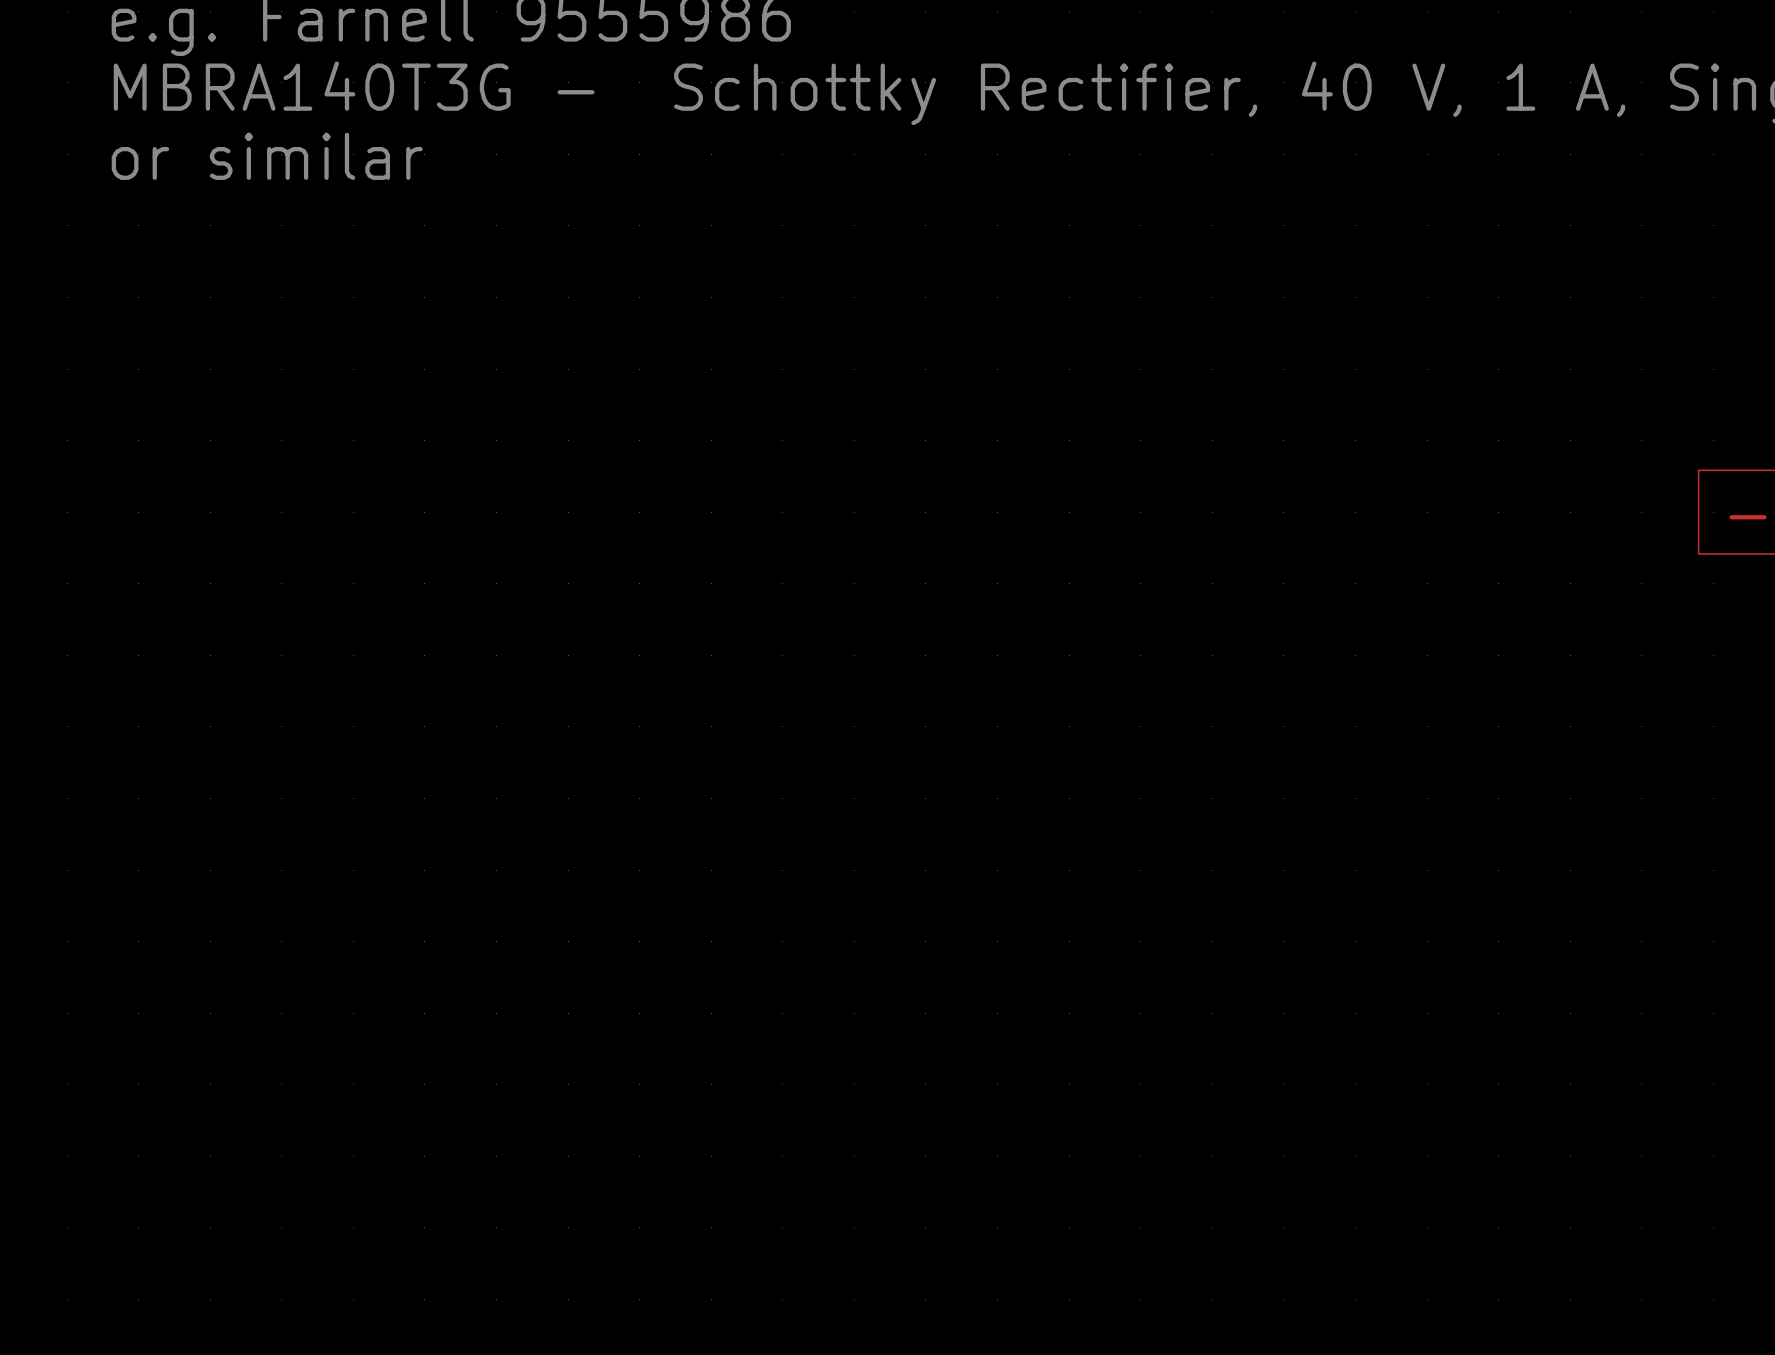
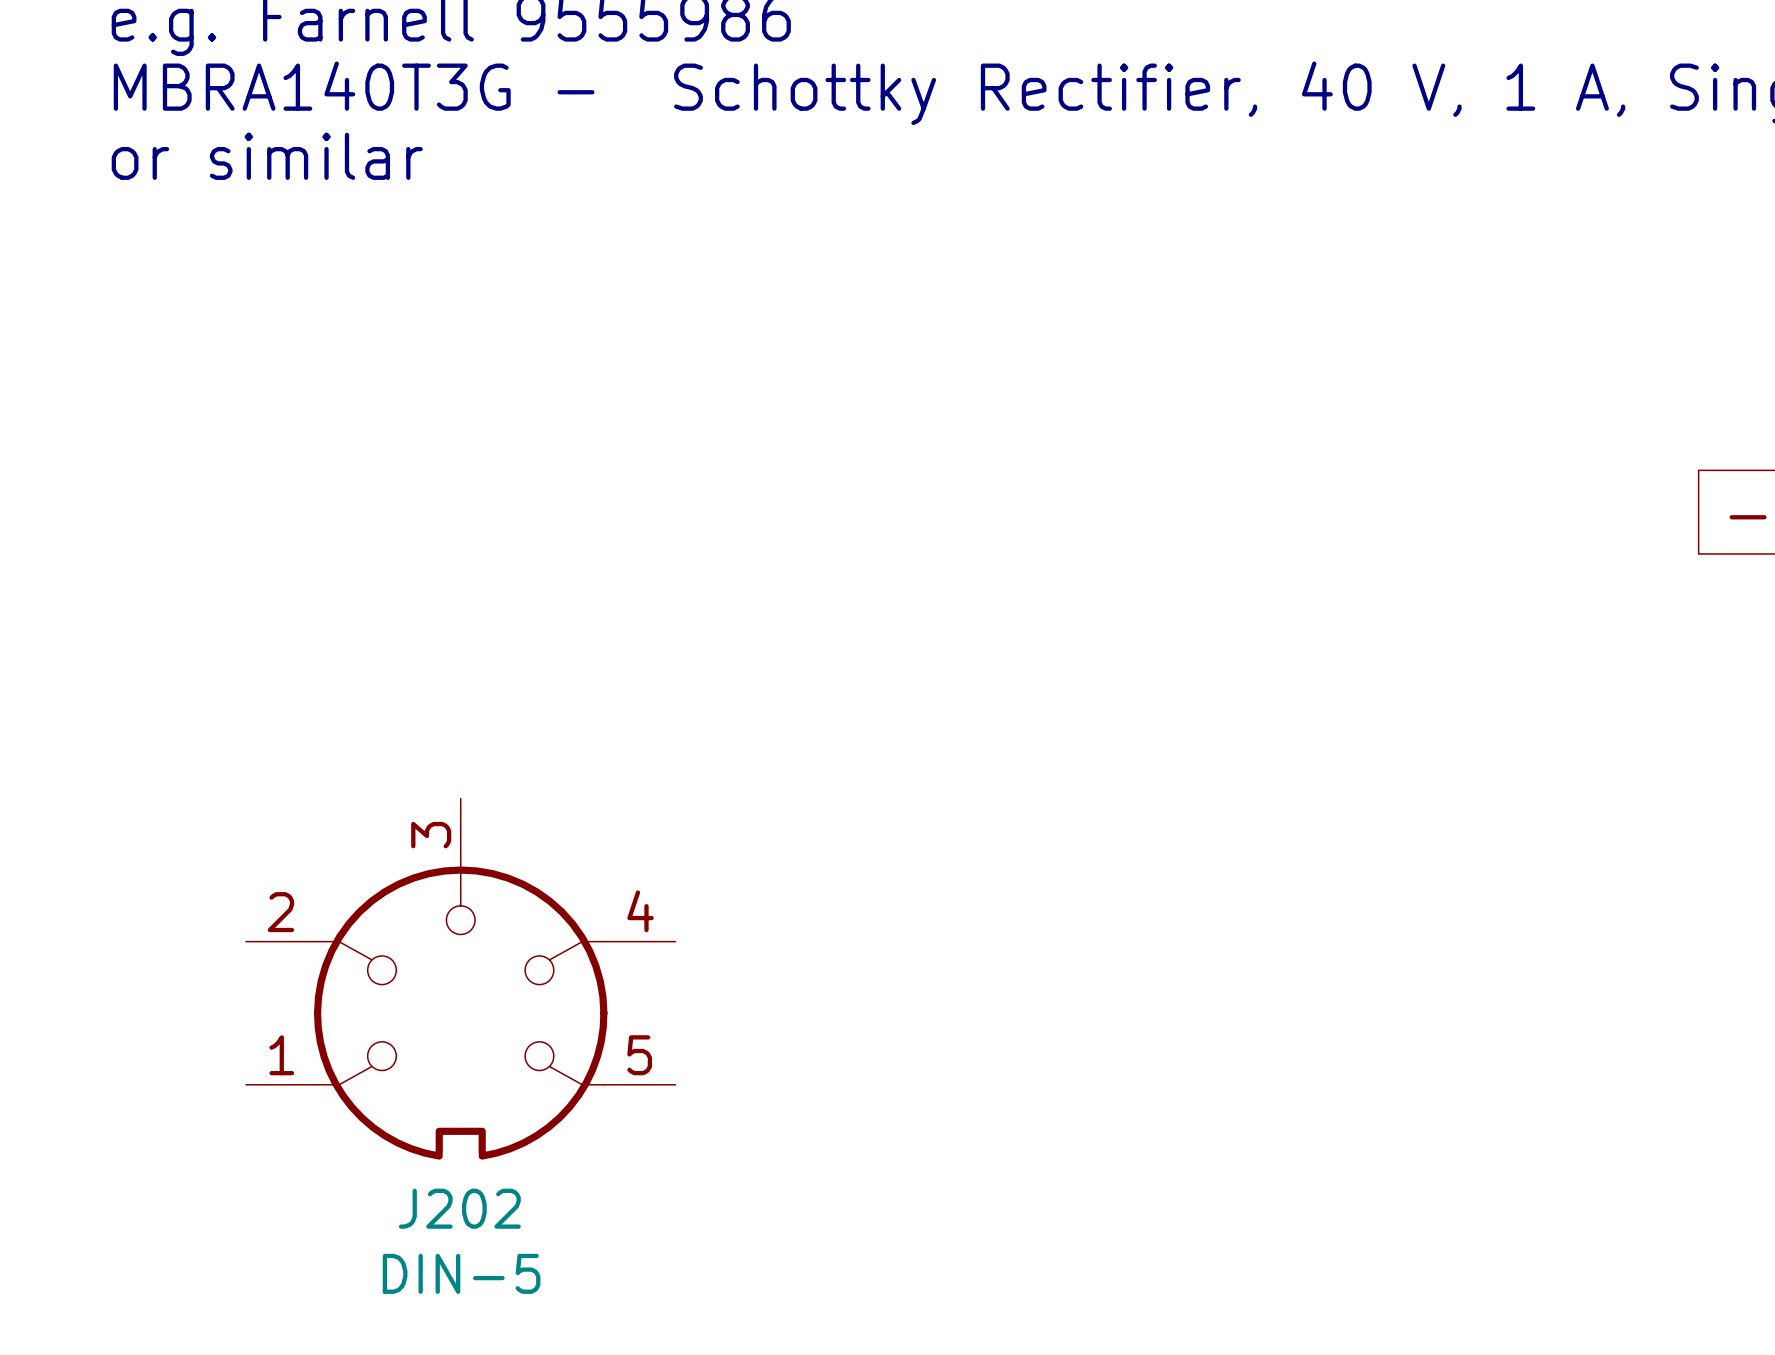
J202: none -> DIN-5 (460, 979)

